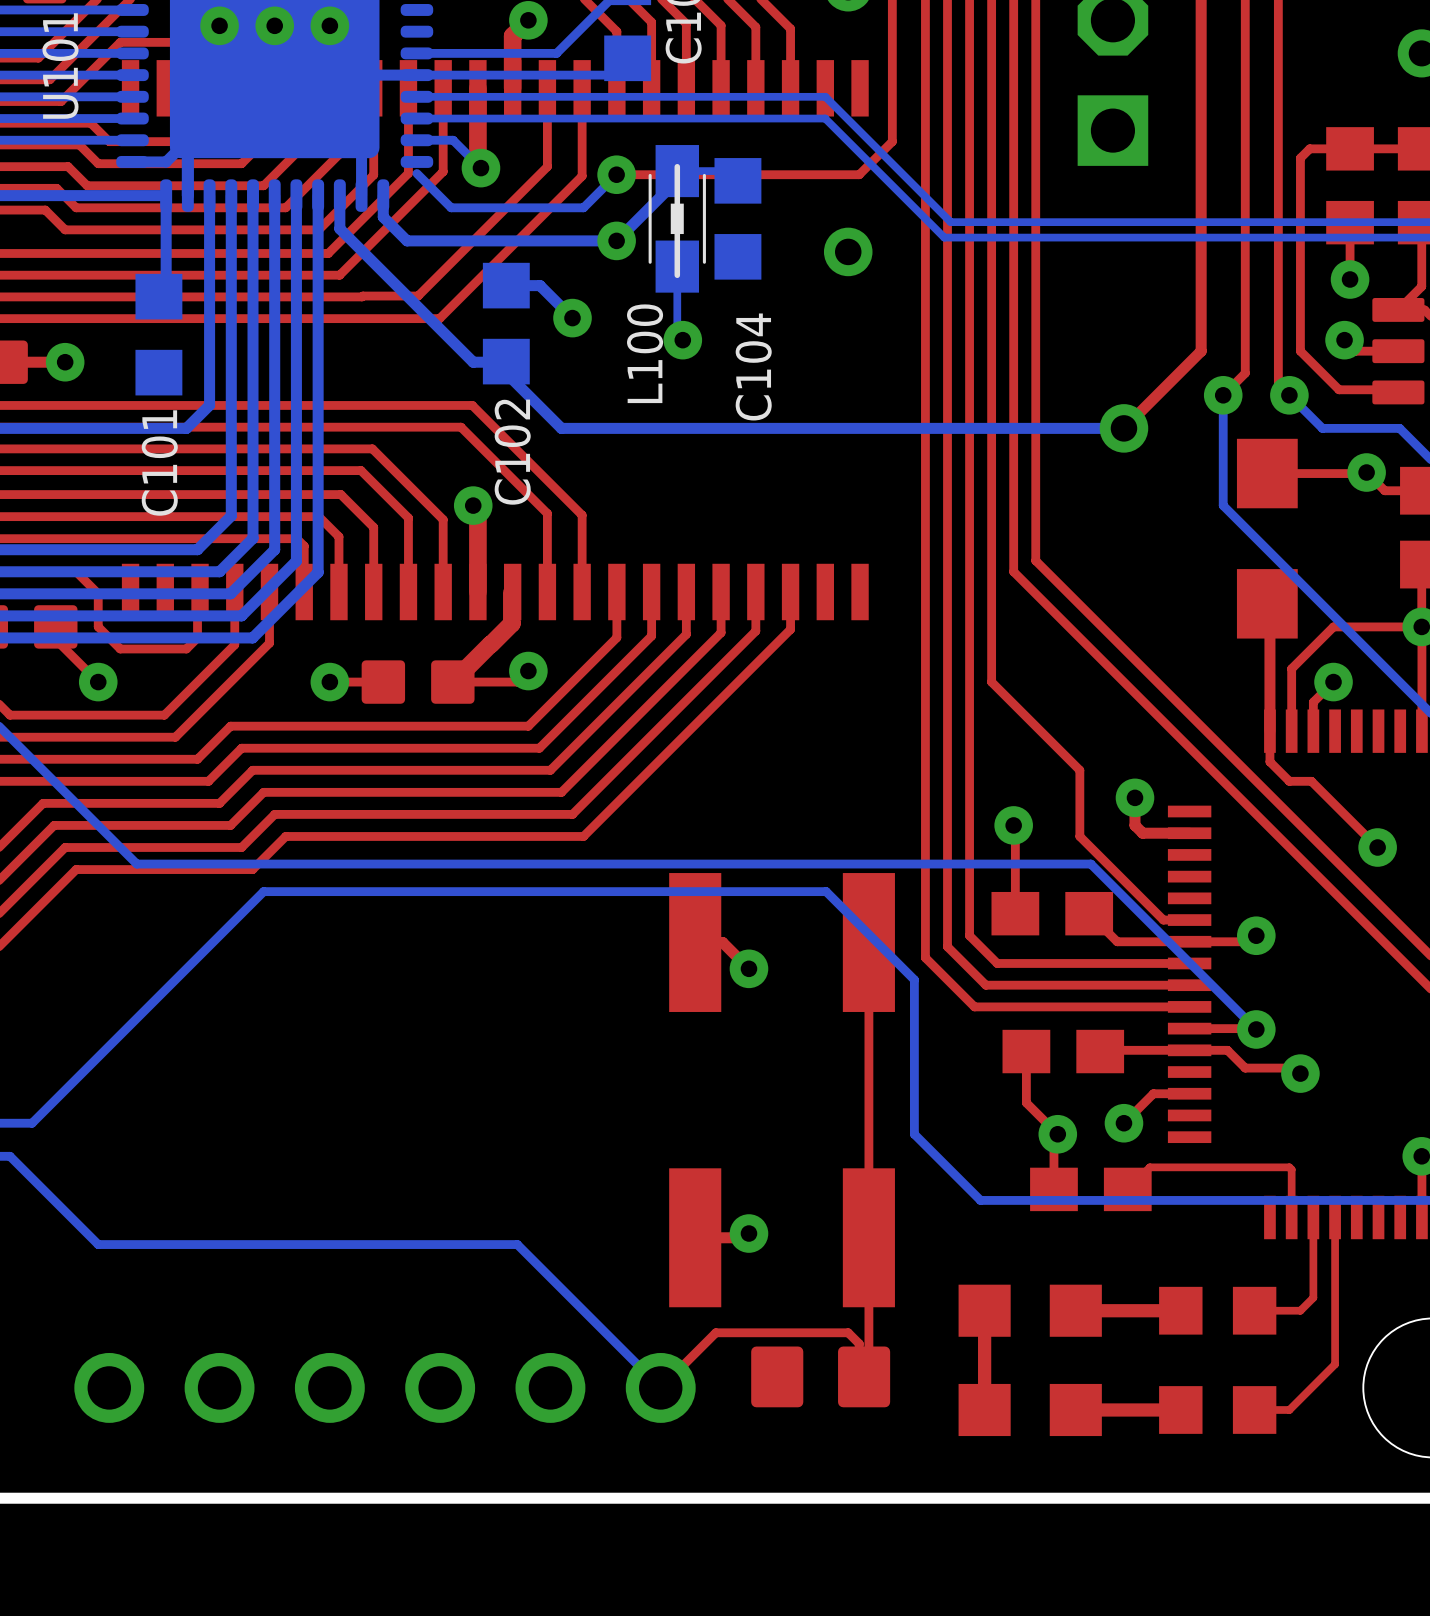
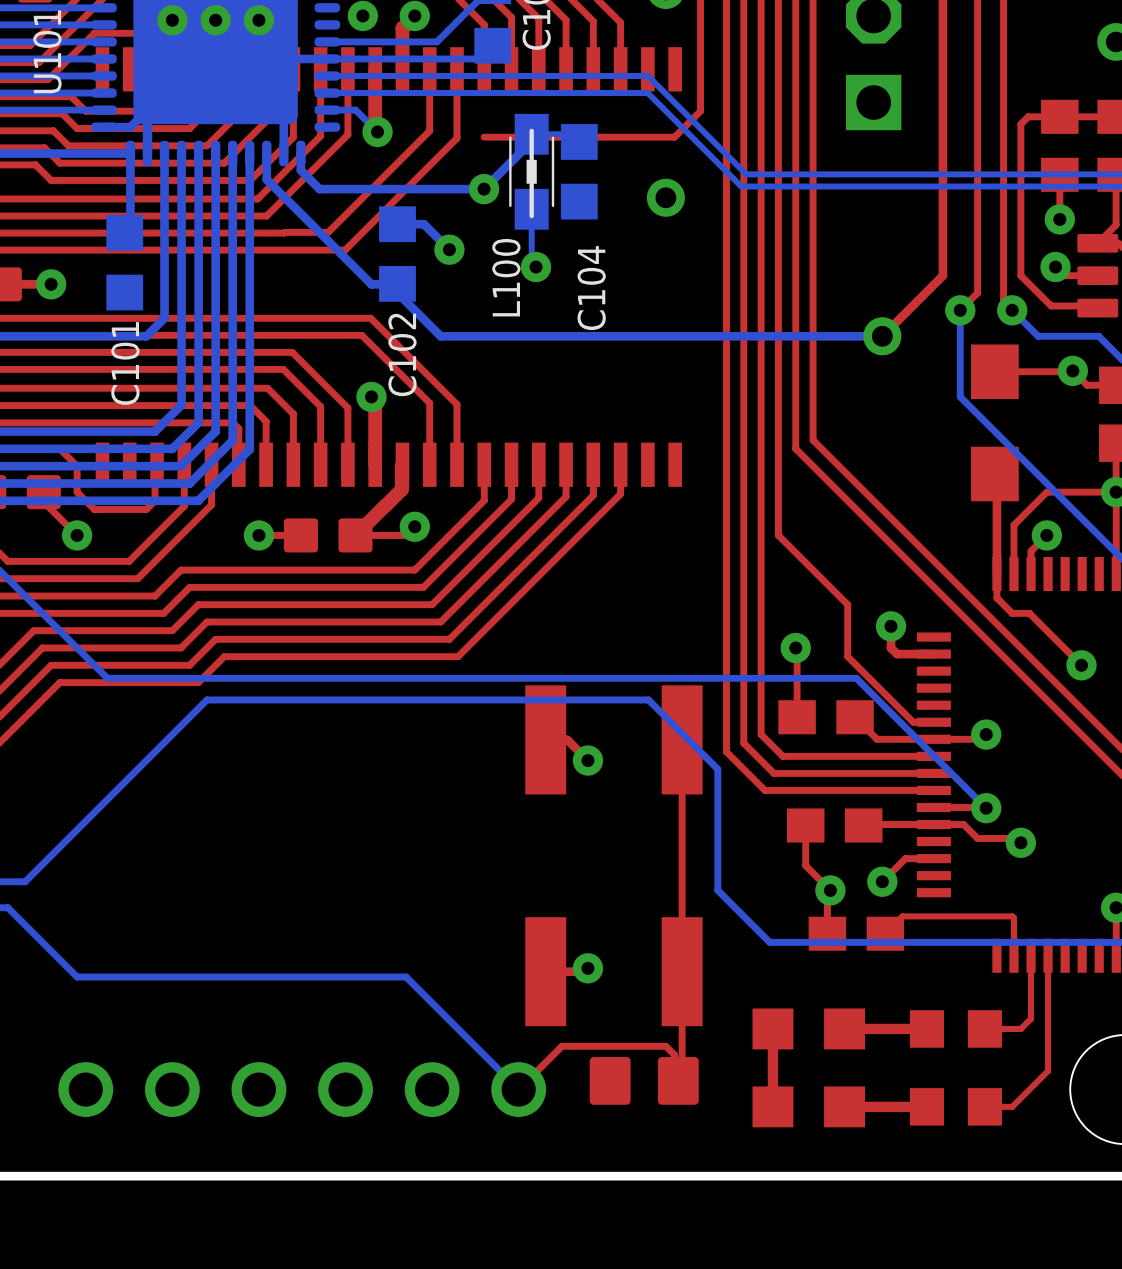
via: none -> (362, 15)
bottom track: (416, 173) (451, 207) (583, 207) (616, 174) -> none
via: (616, 174) -> none

